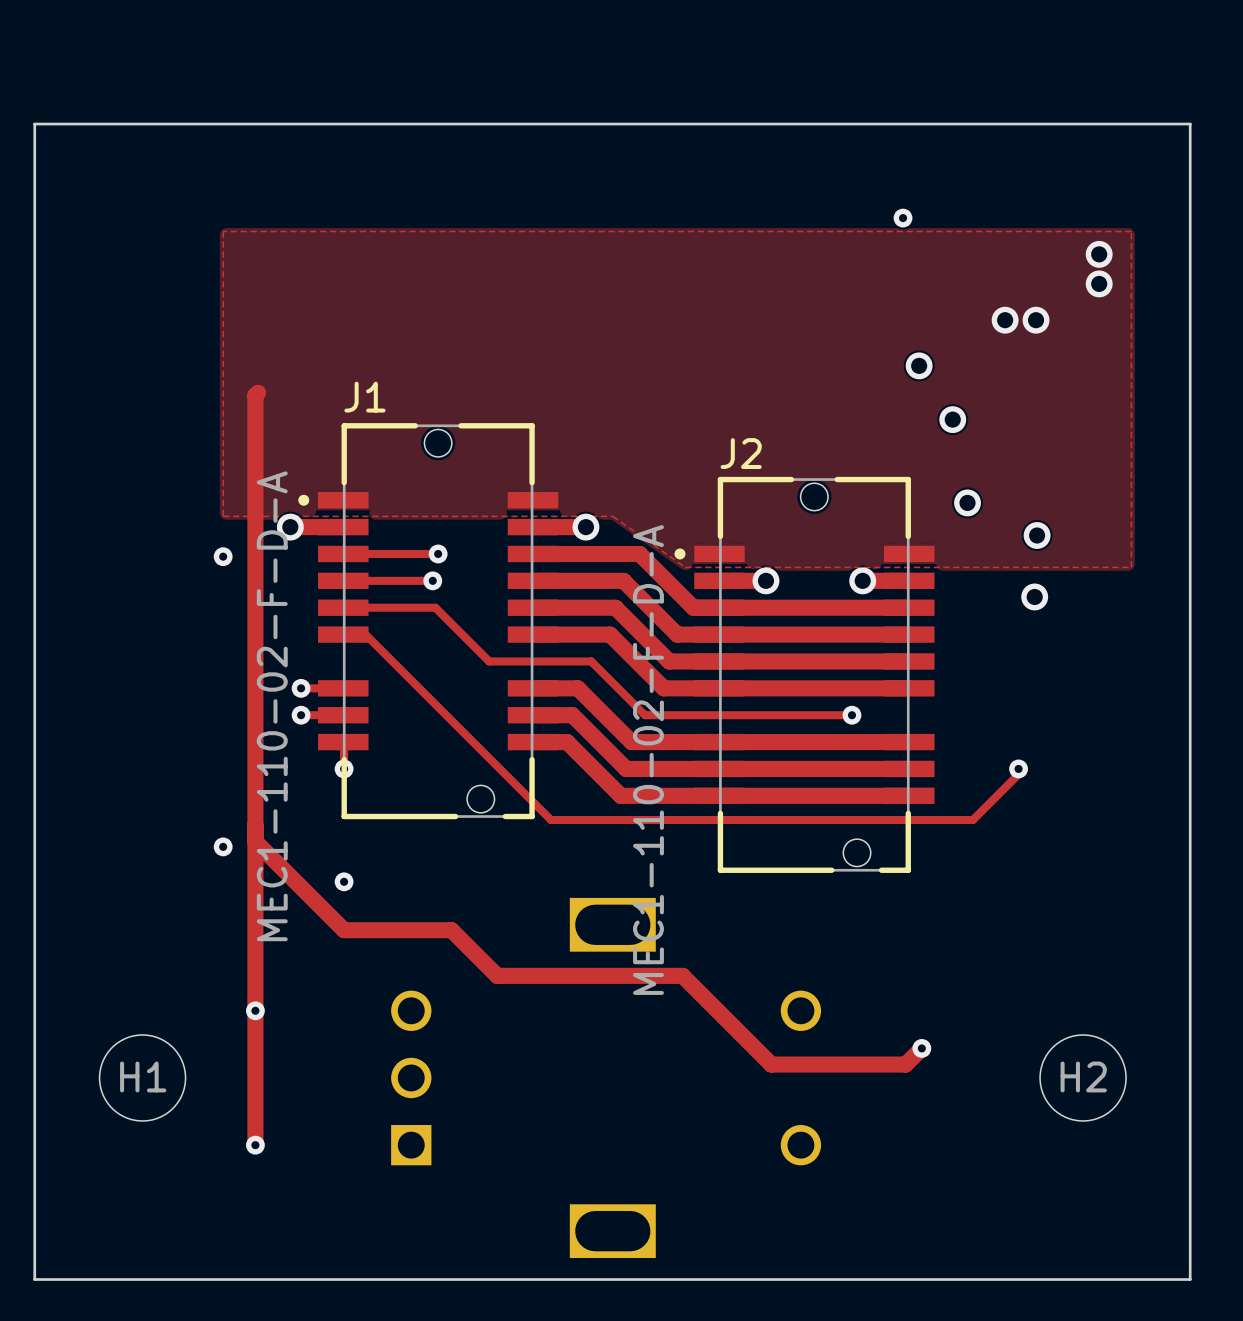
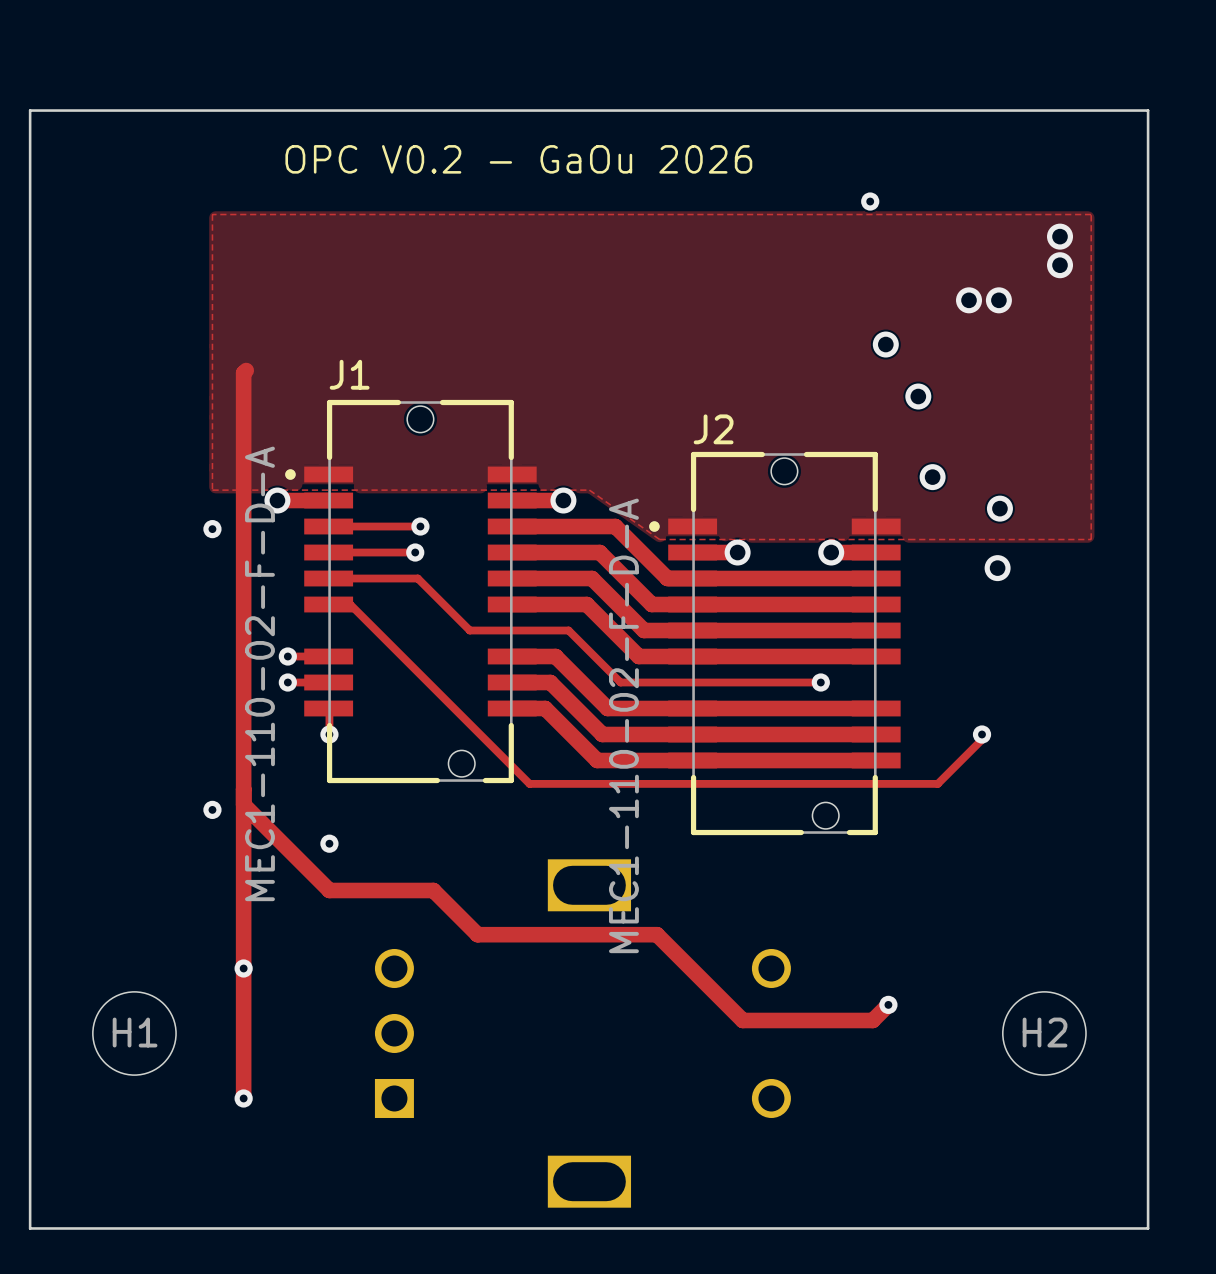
text: none -> OPC V0.2 - GaOu 2026 (518, 159)

